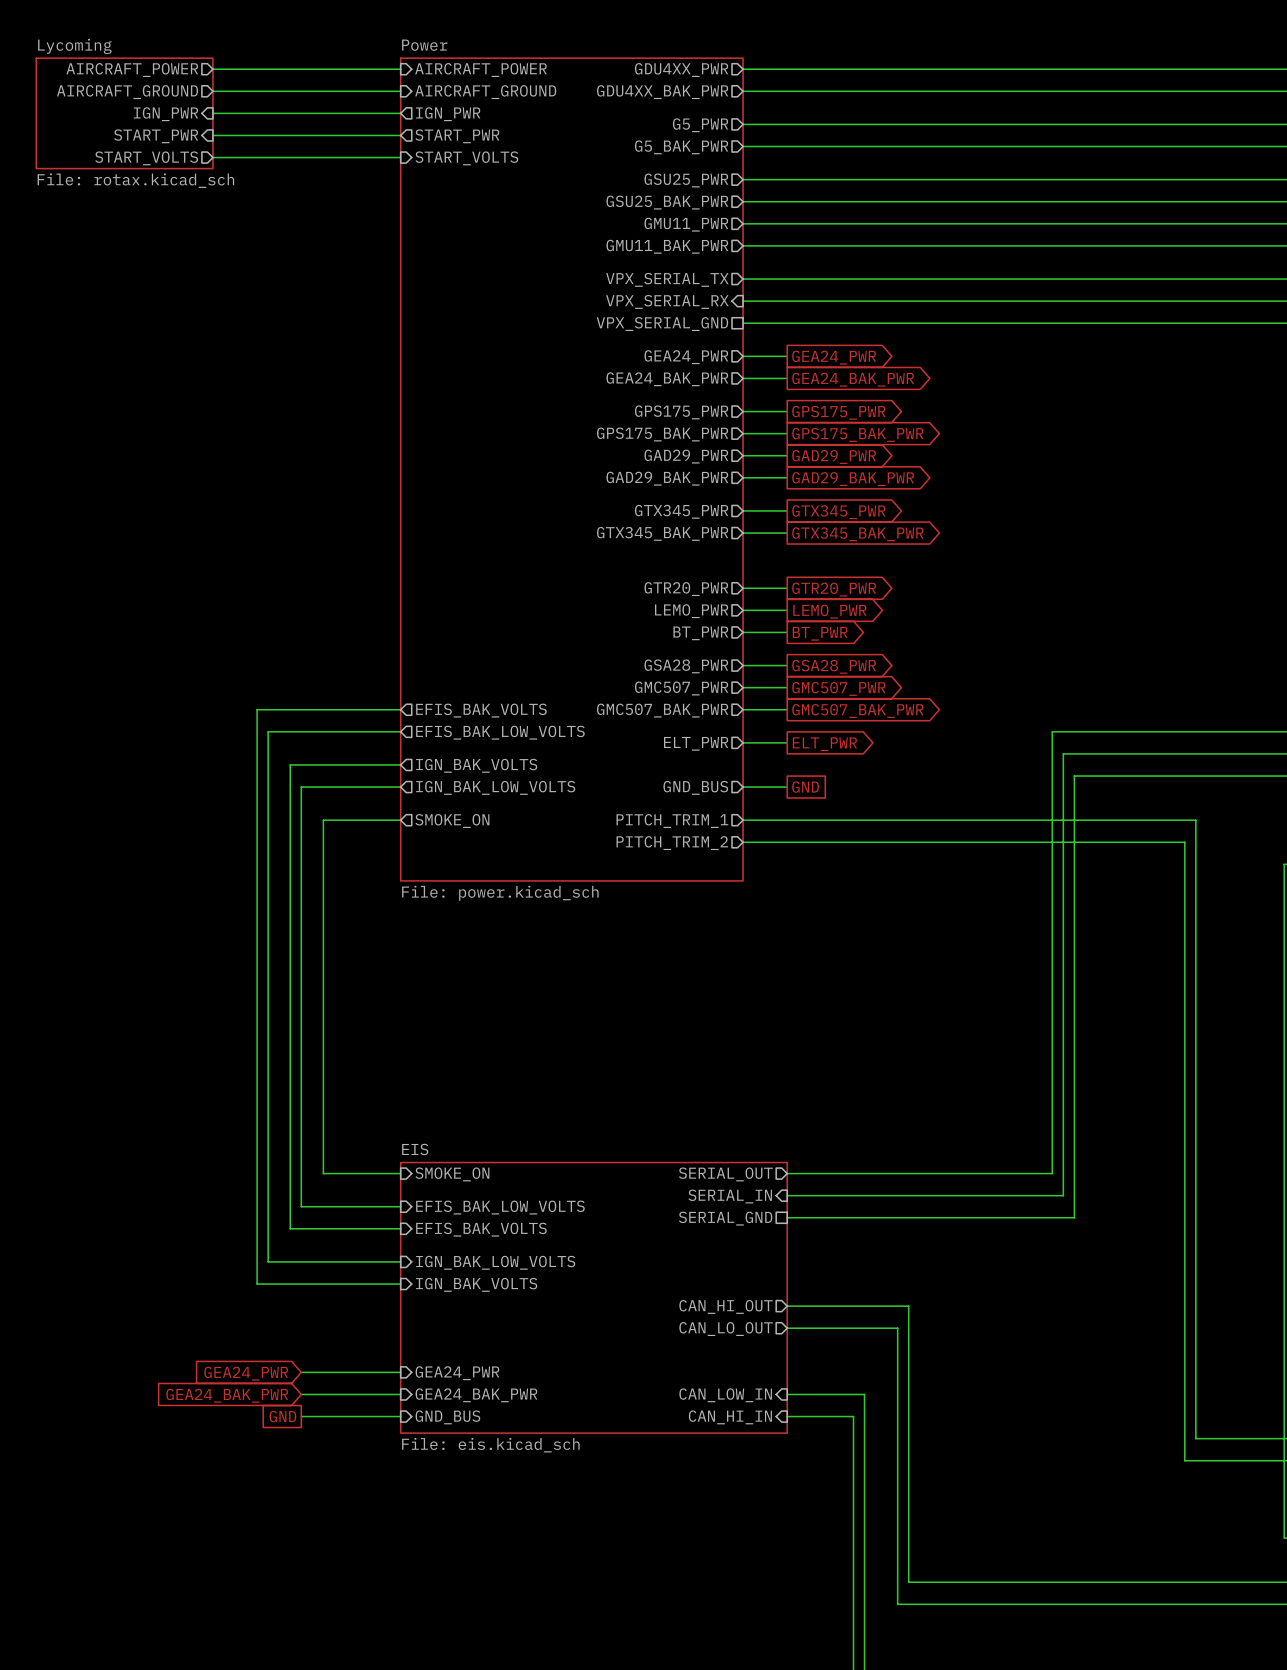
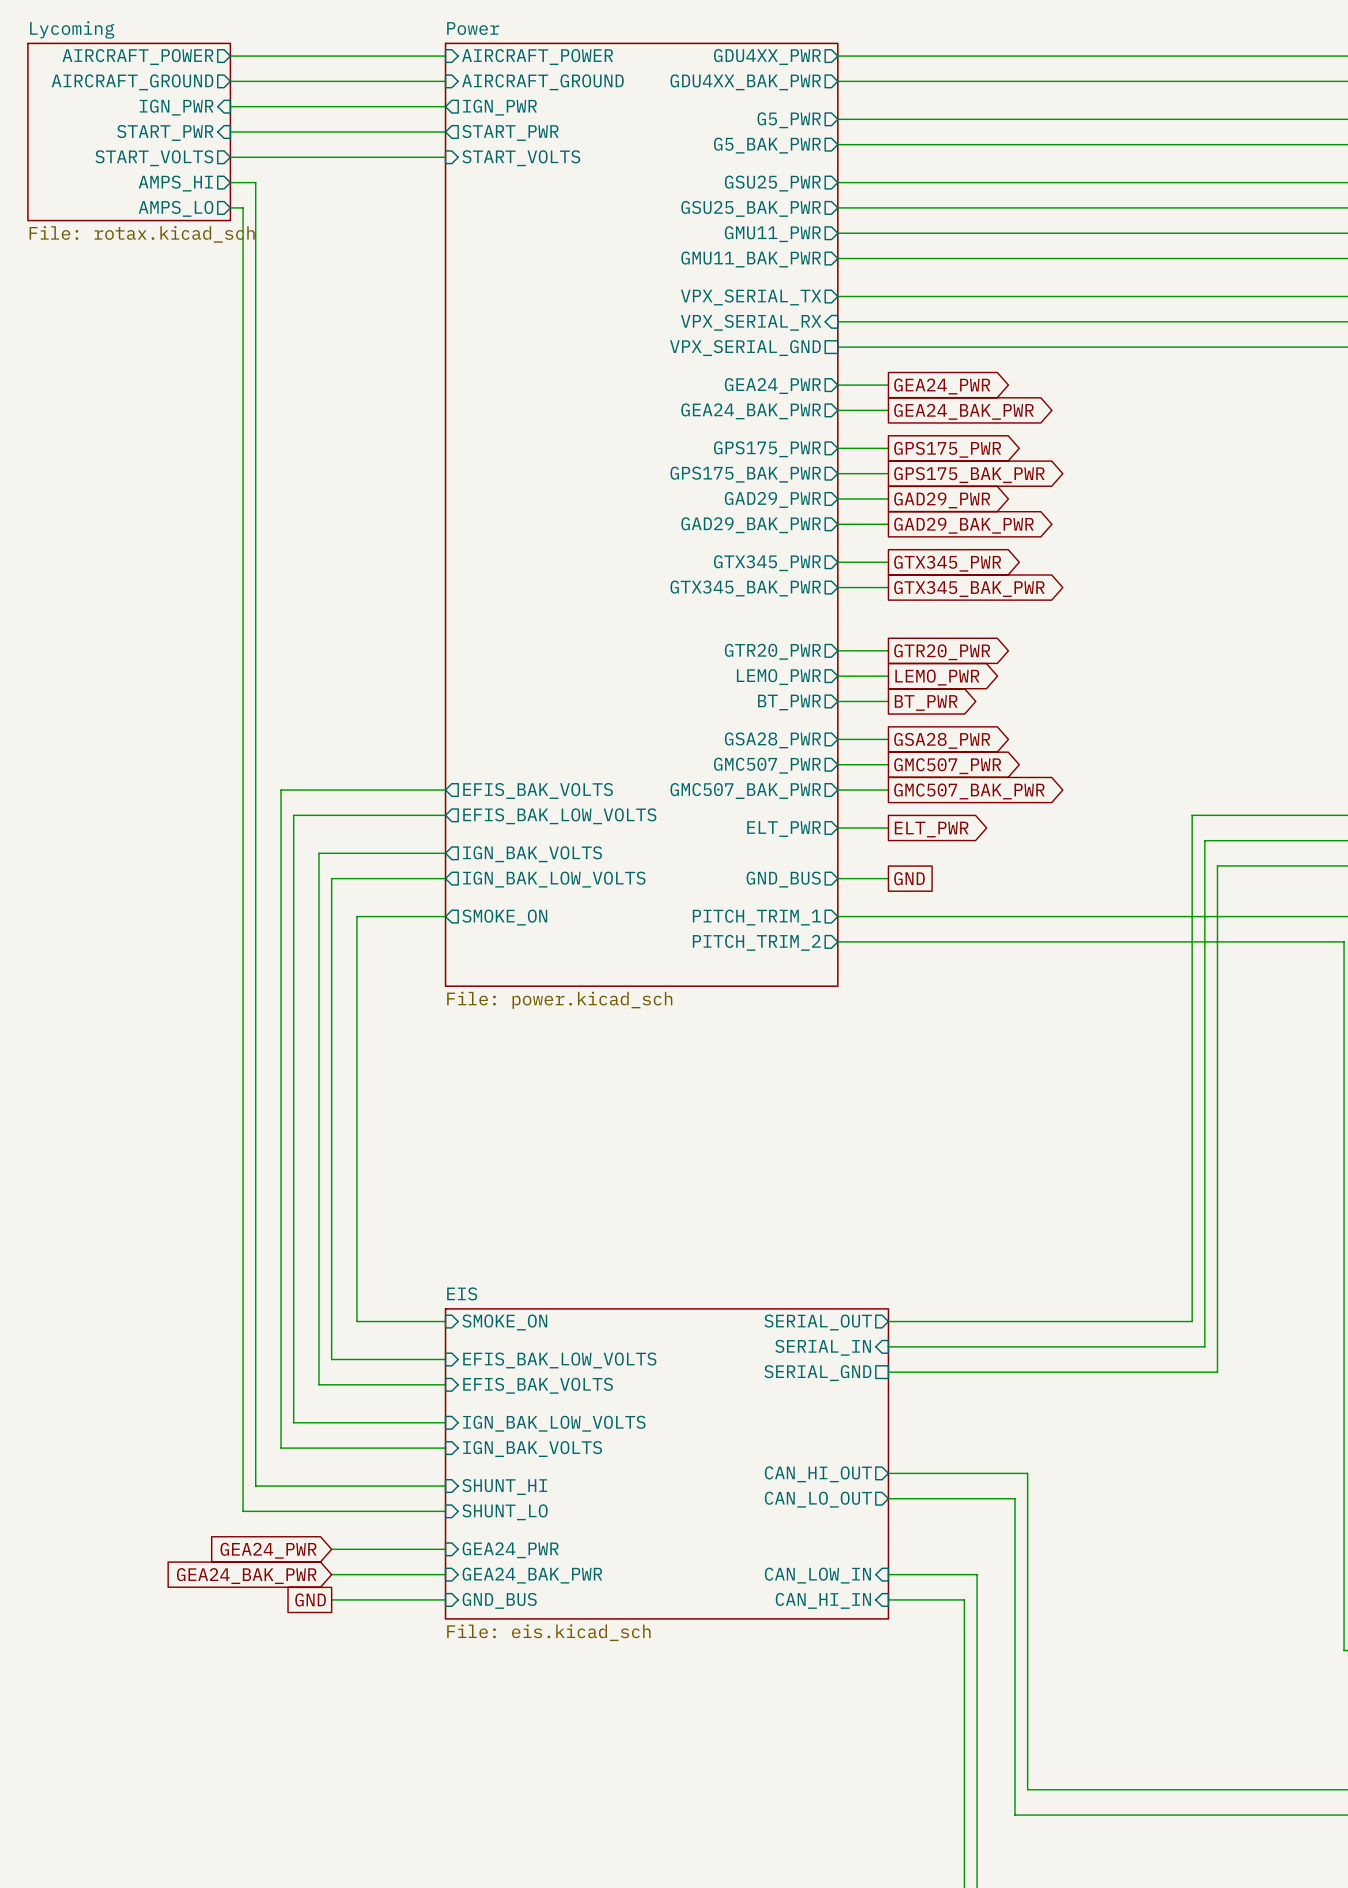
sheet Lycoming: File: rotax.kicad_sch (124, 113) -> none
sheet Lycoming: none -> File: rotax.kicad_sch (129, 131)
wire: none -> (230, 182) (255, 182) (255, 1486) (445, 1486)
sheet pin: none -> AMPS_HI (175, 183)
wire: none -> (230, 207) (243, 207) (243, 1511) (445, 1511)
sheet pin: none -> AMPS_LO (176, 208)
sheet pin: none -> SHUNT_HI (504, 1487)
sheet pin: none -> SHUNT_LO (505, 1512)

